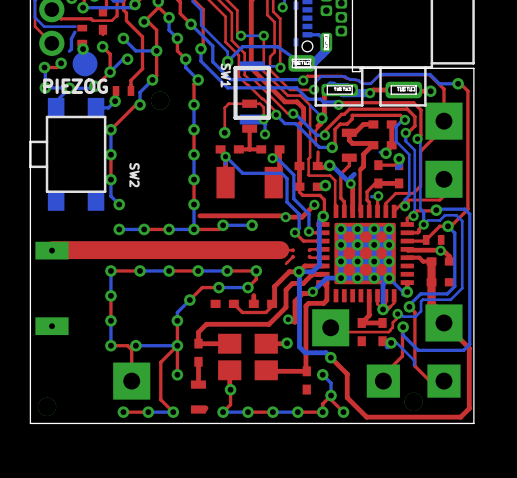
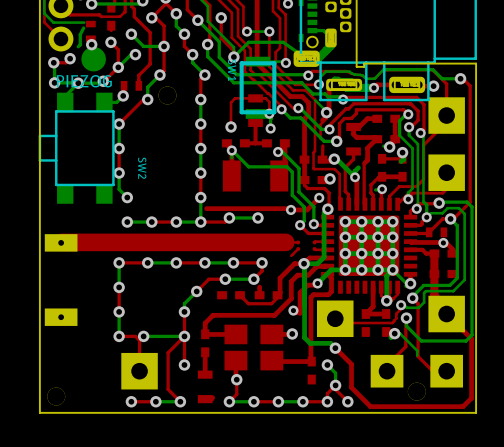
top track: none -> (221, 17) (221, 38) (233, 50) (233, 57)
via: none -> (221, 17)

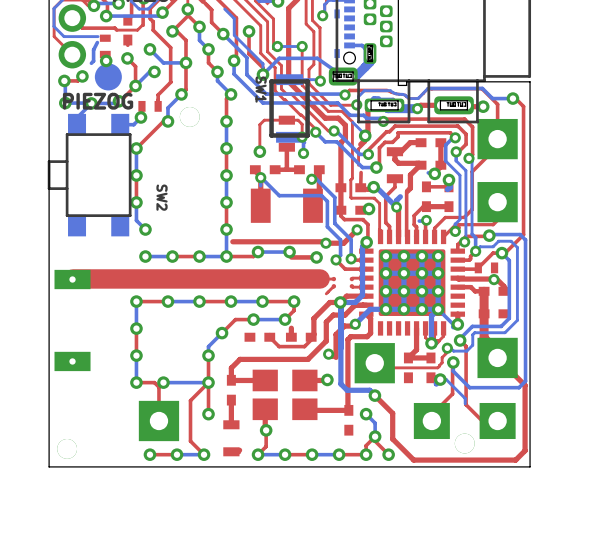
top track: none -> (316, 257) (291, 257)
via: none -> (316, 257)

